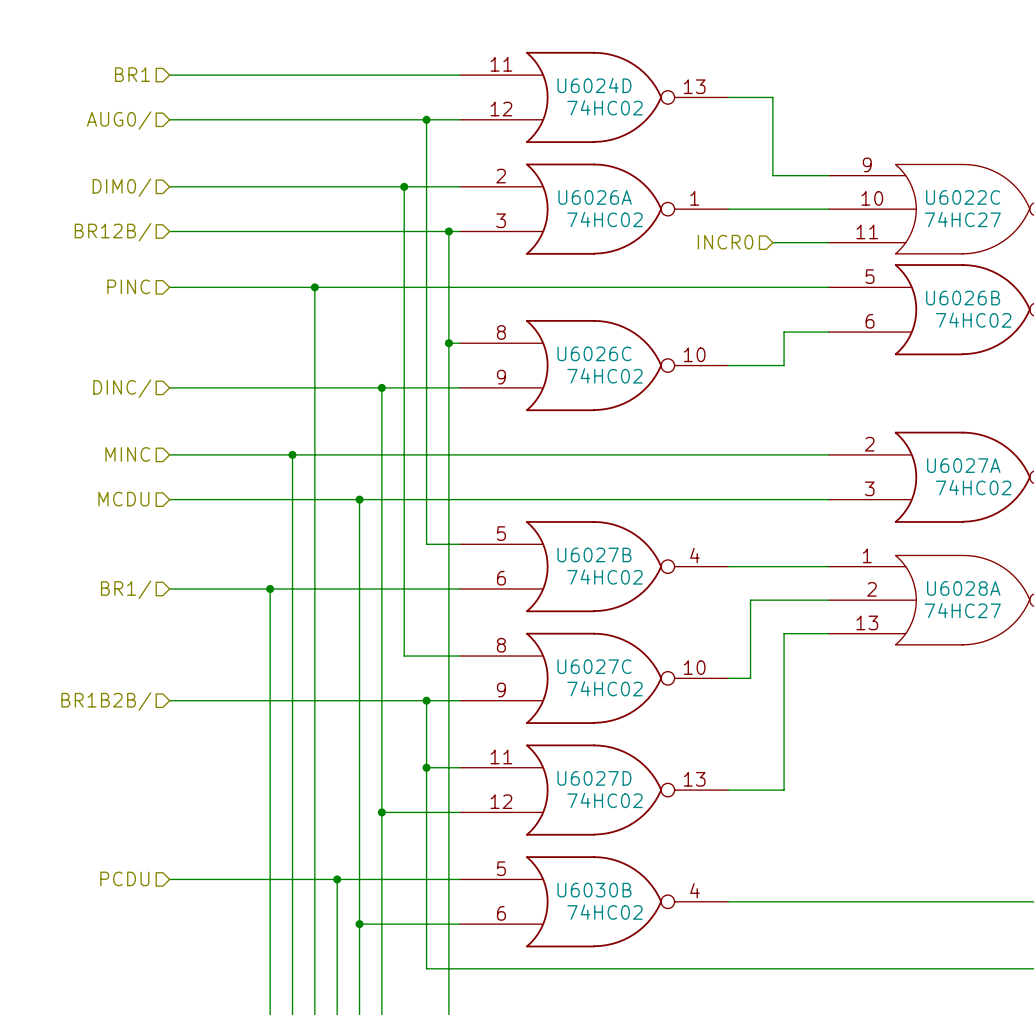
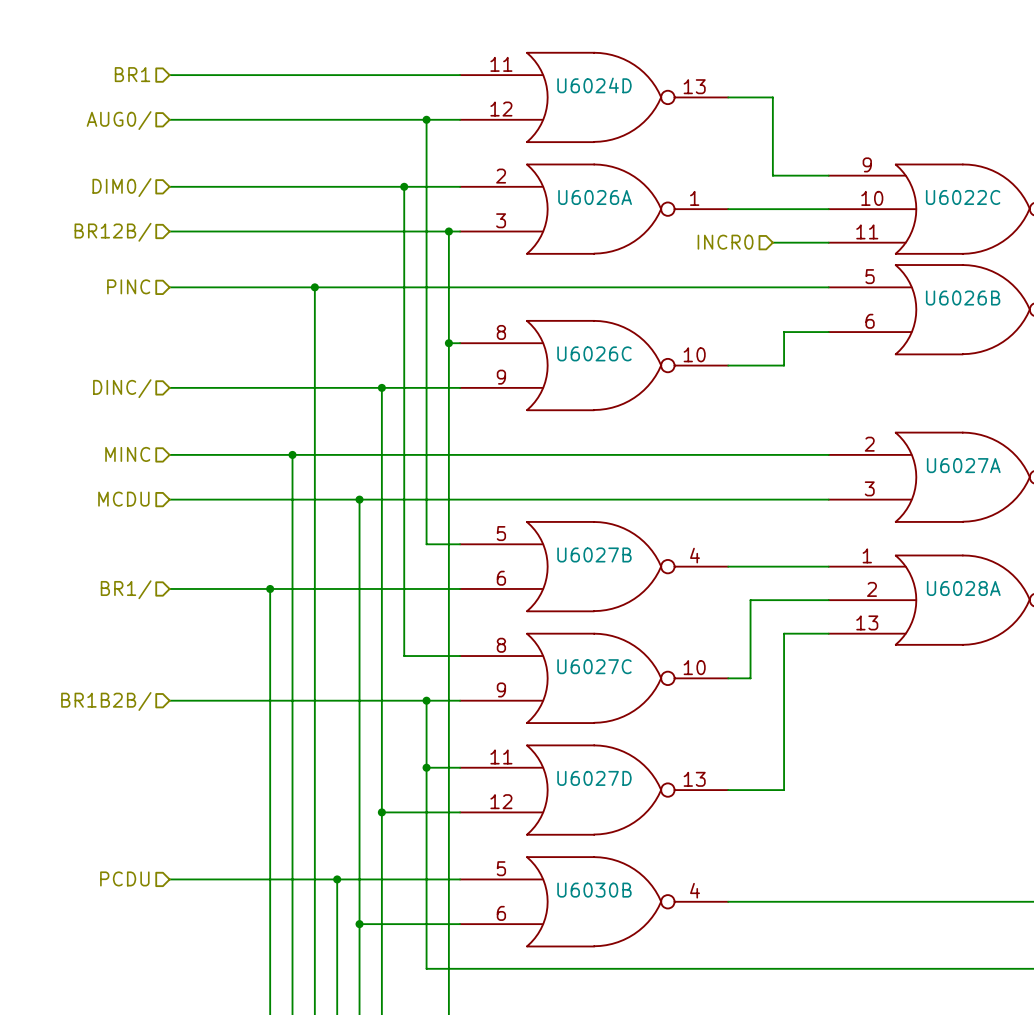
U6024D value: 74HC02 (604, 107) -> none
U6026A value: 74HC02 (604, 219) -> none
U6022C value: 74HC27 (962, 219) -> none
U6026B value: 74HC02 (973, 320) -> none
U6026C value: 74HC02 (604, 375) -> none
U6027A value: 74HC02 (973, 487) -> none
U6027B value: 74HC02 (604, 576) -> none
U6028A value: 74HC27 (962, 610) -> none
U6027C value: 74HC02 (604, 688) -> none
U6027D value: 74HC02 (604, 800) -> none
U6030B value: 74HC02 (604, 912) -> none

